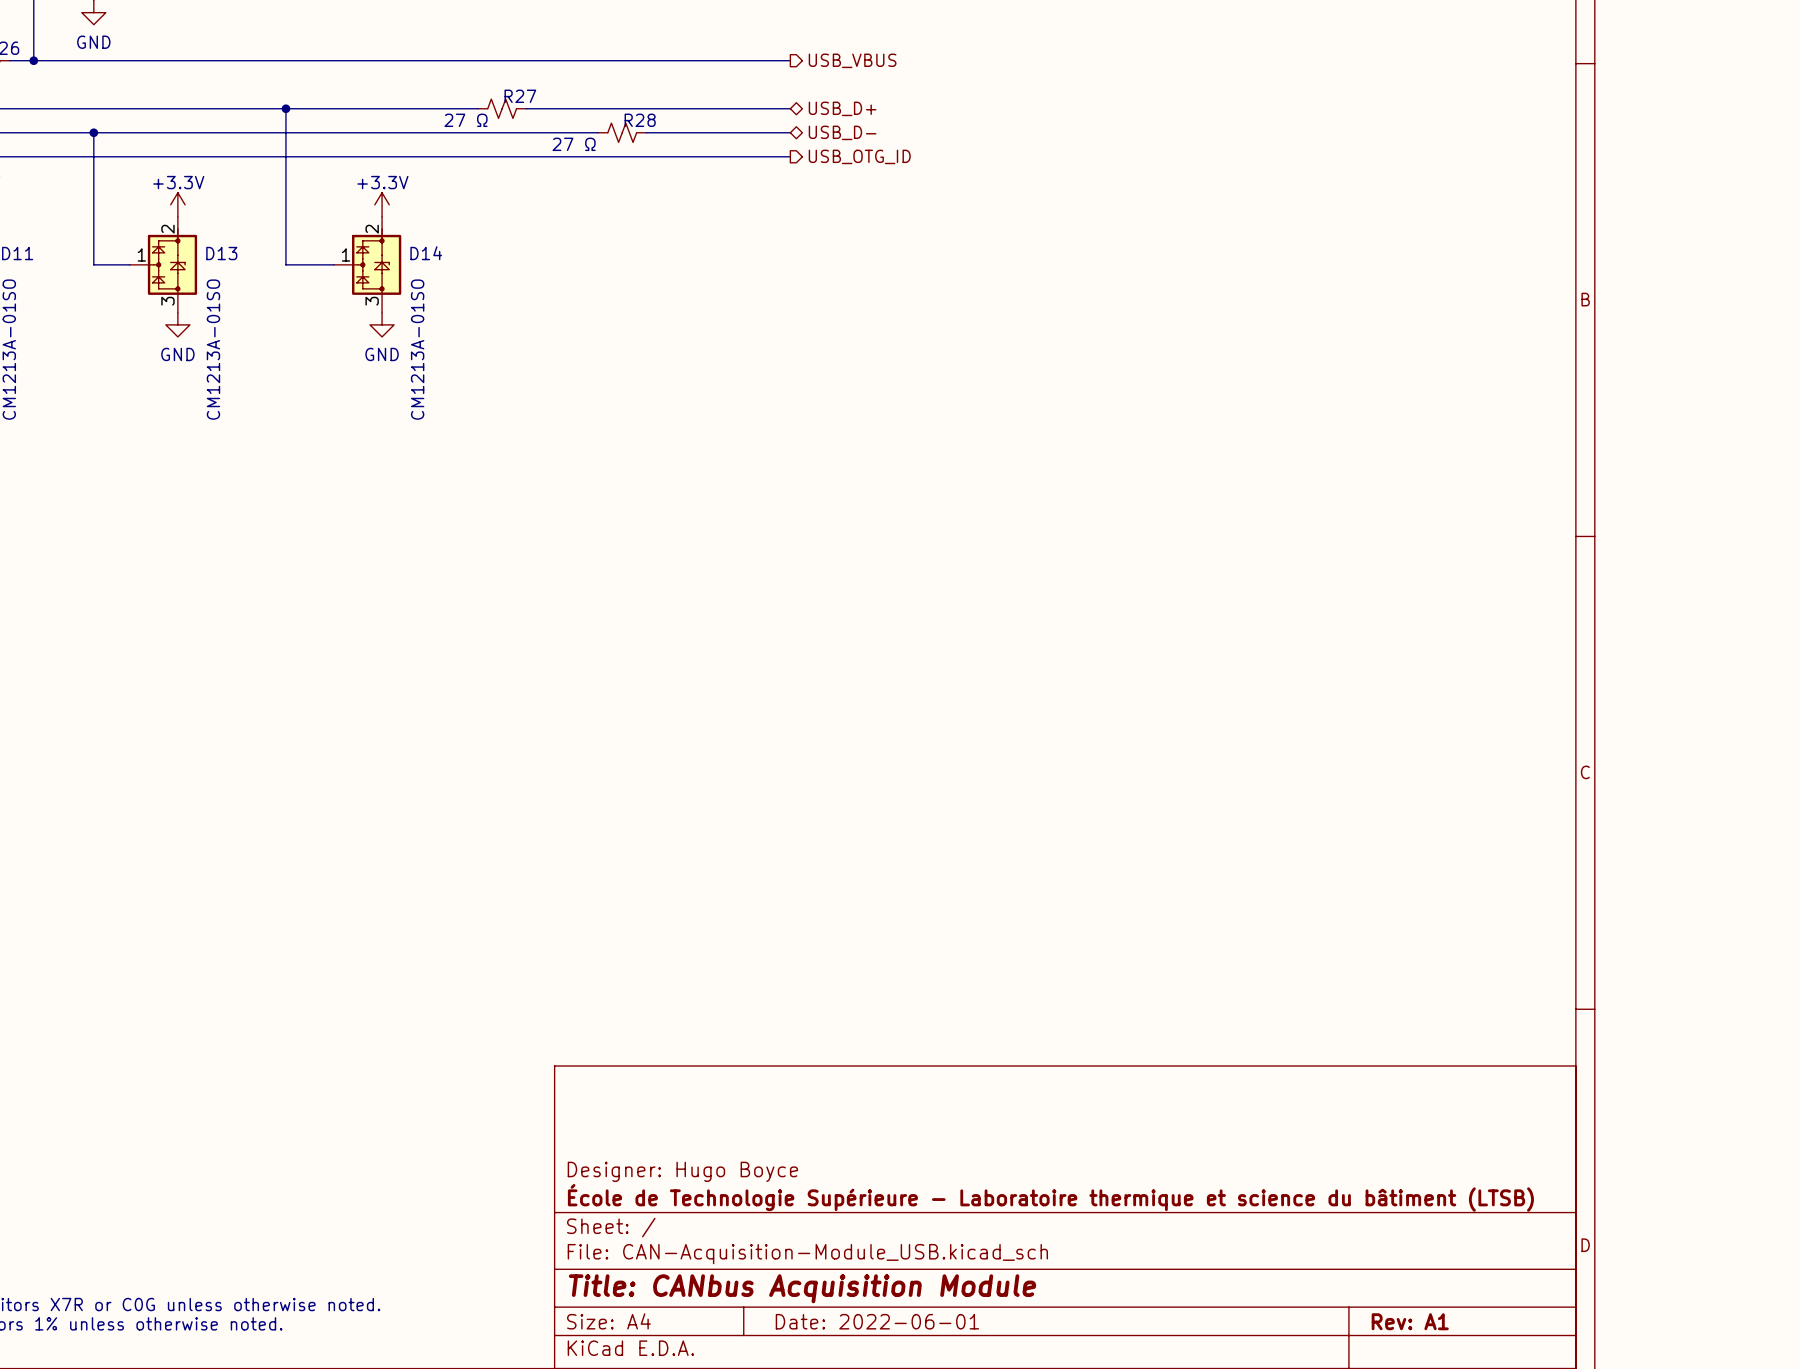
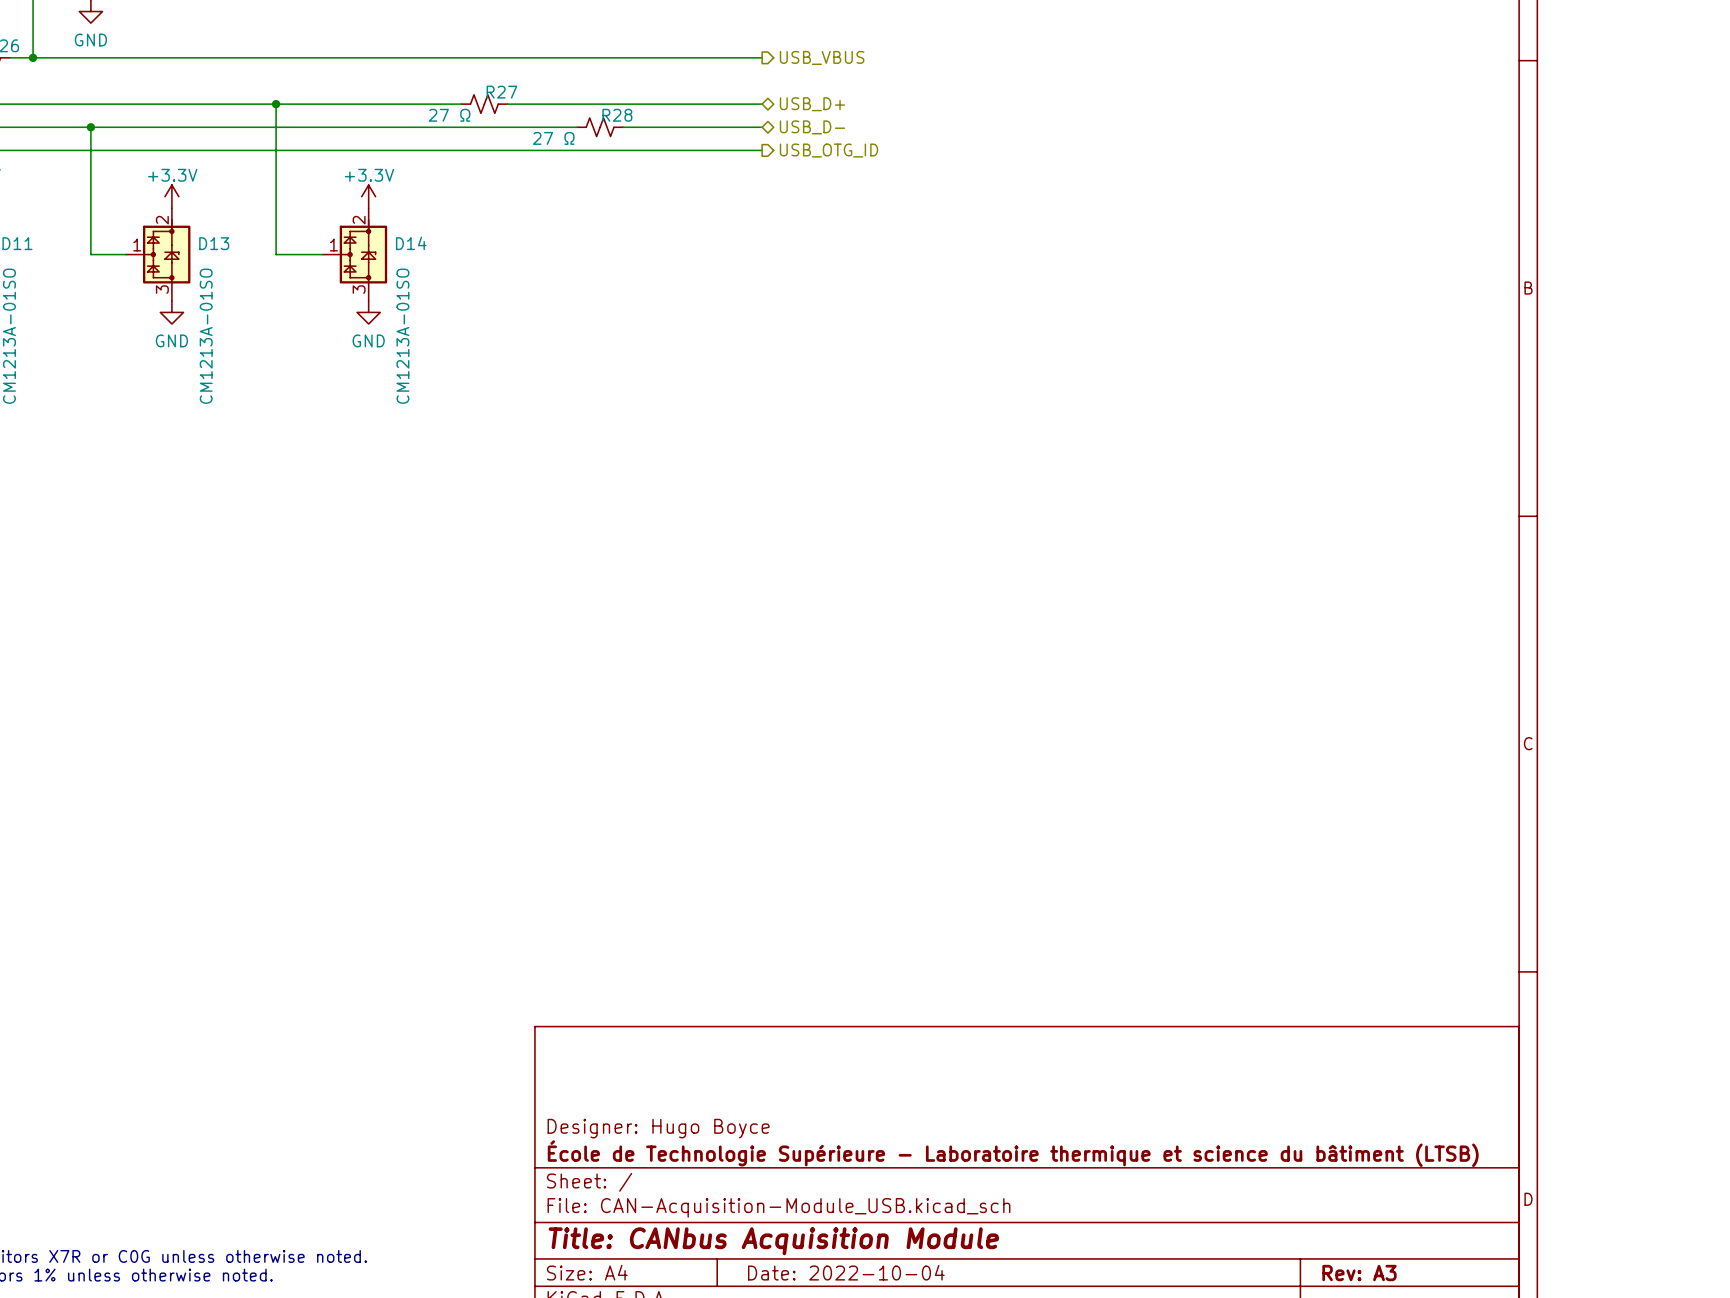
title block: Date: 2022-06-01 (877, 1321) -> Date: 2022-10-04 (846, 1272)
title block: Rev: A1 (1410, 1321) -> Rev: A3 (1359, 1273)

